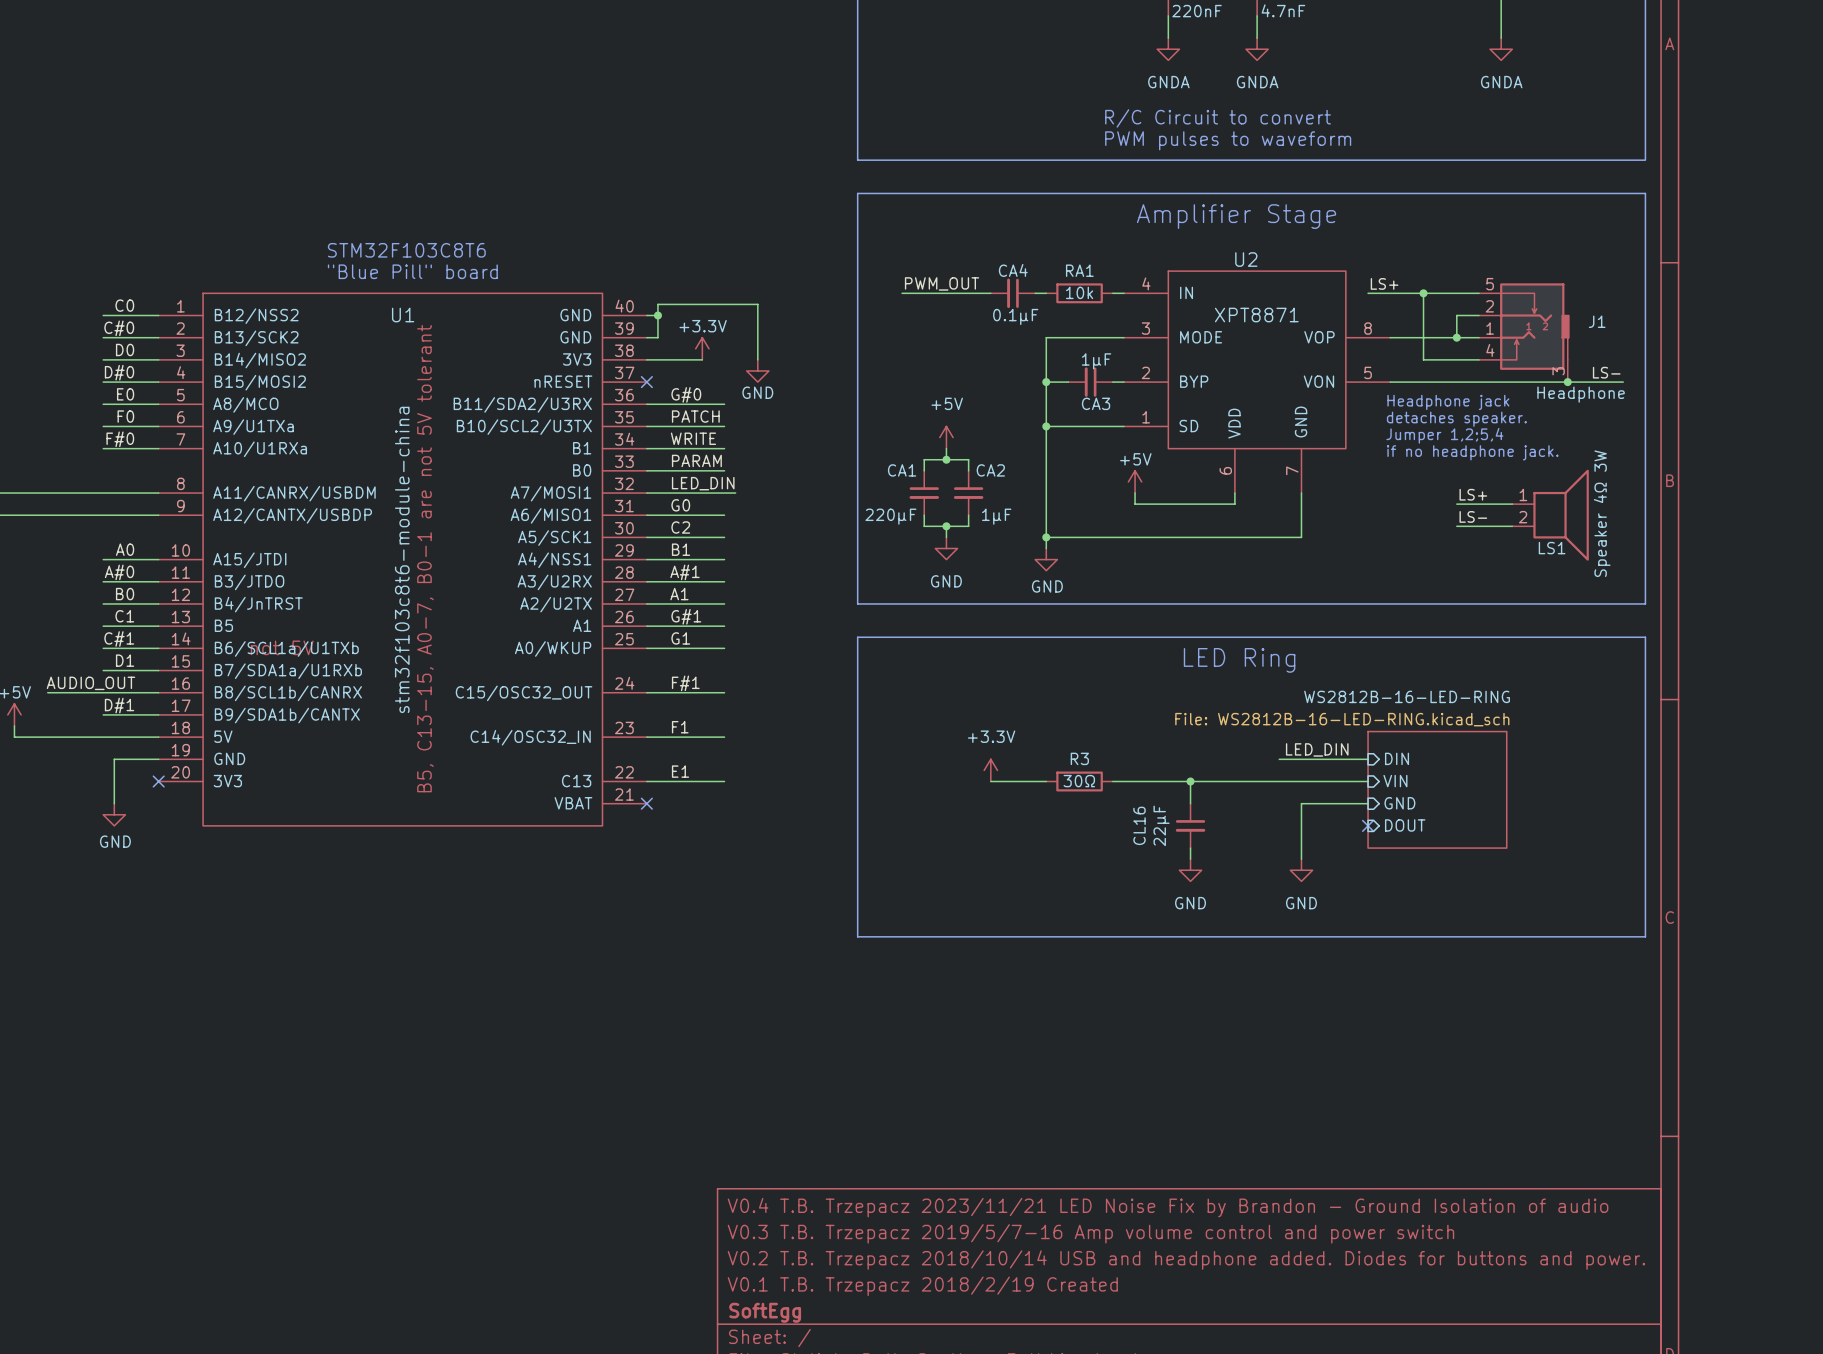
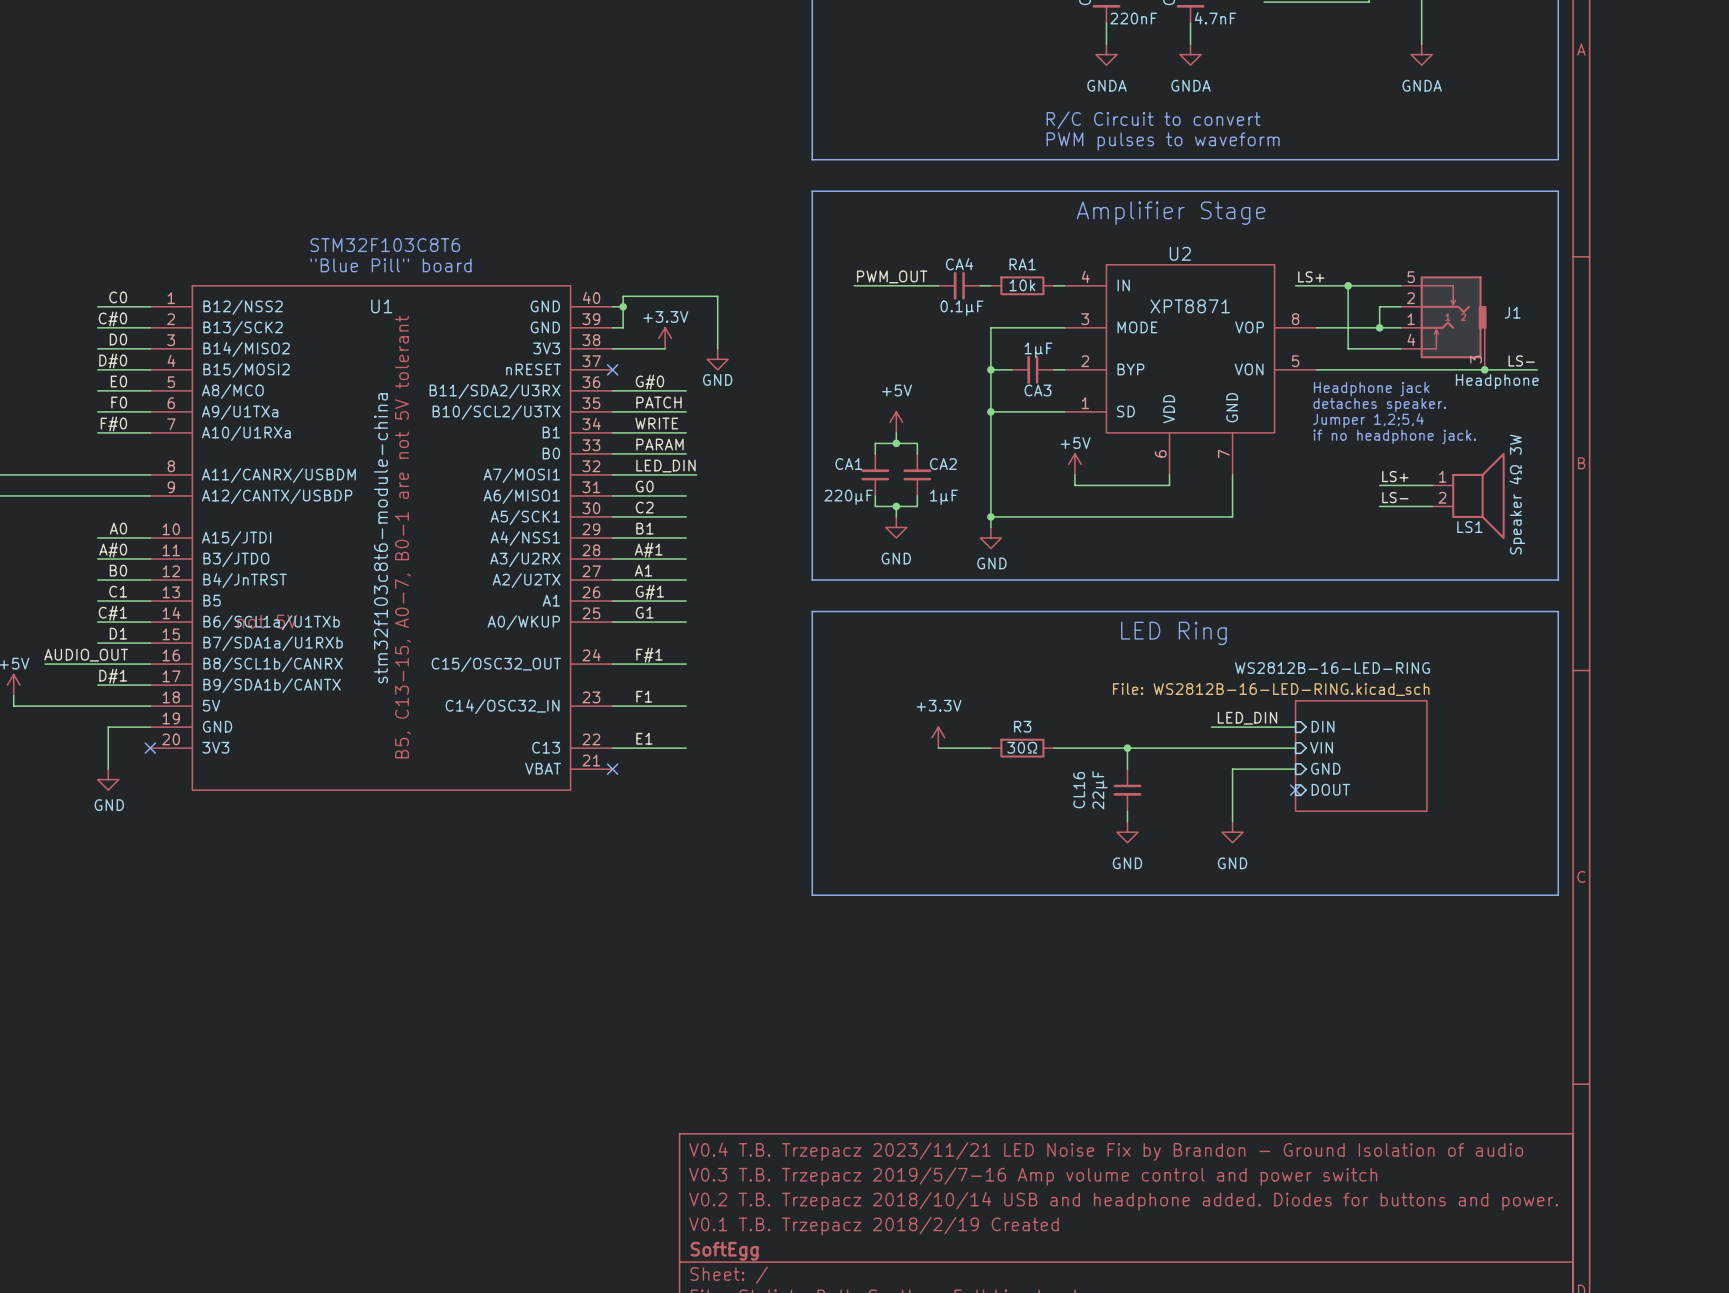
CA1 rotation: 0° (924, 493) -> 180° (875, 474)
CA2 rotation: 0° (968, 493) -> 180° (917, 474)

